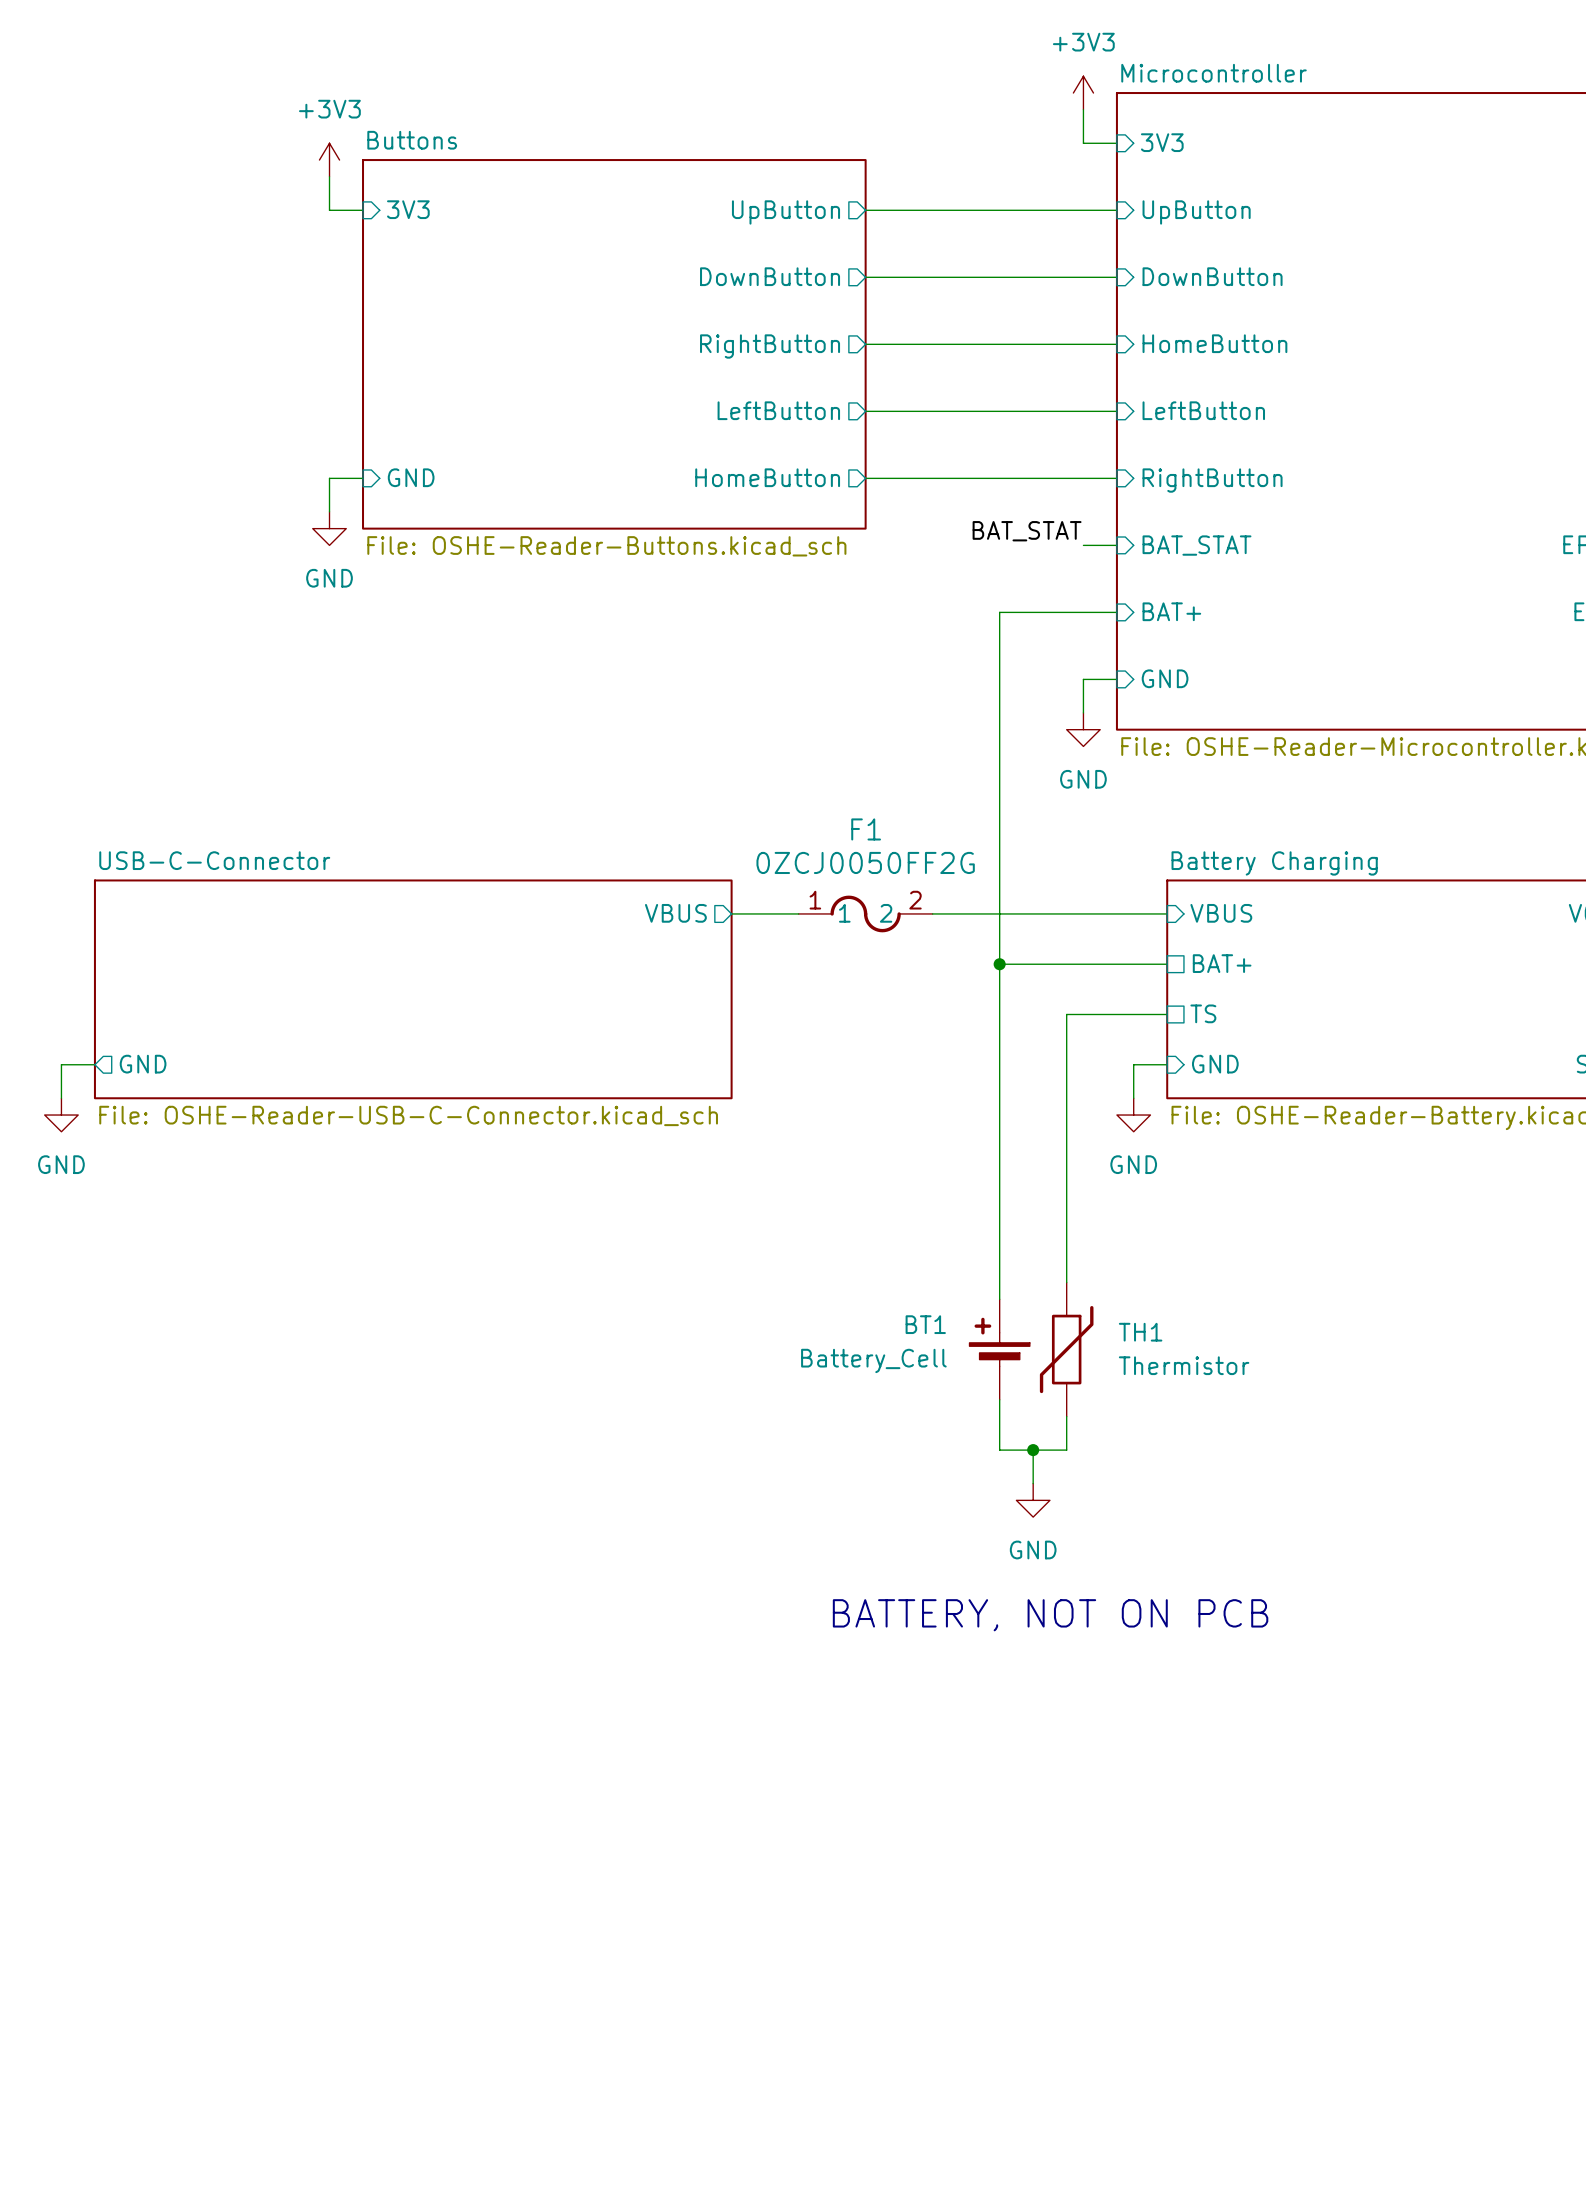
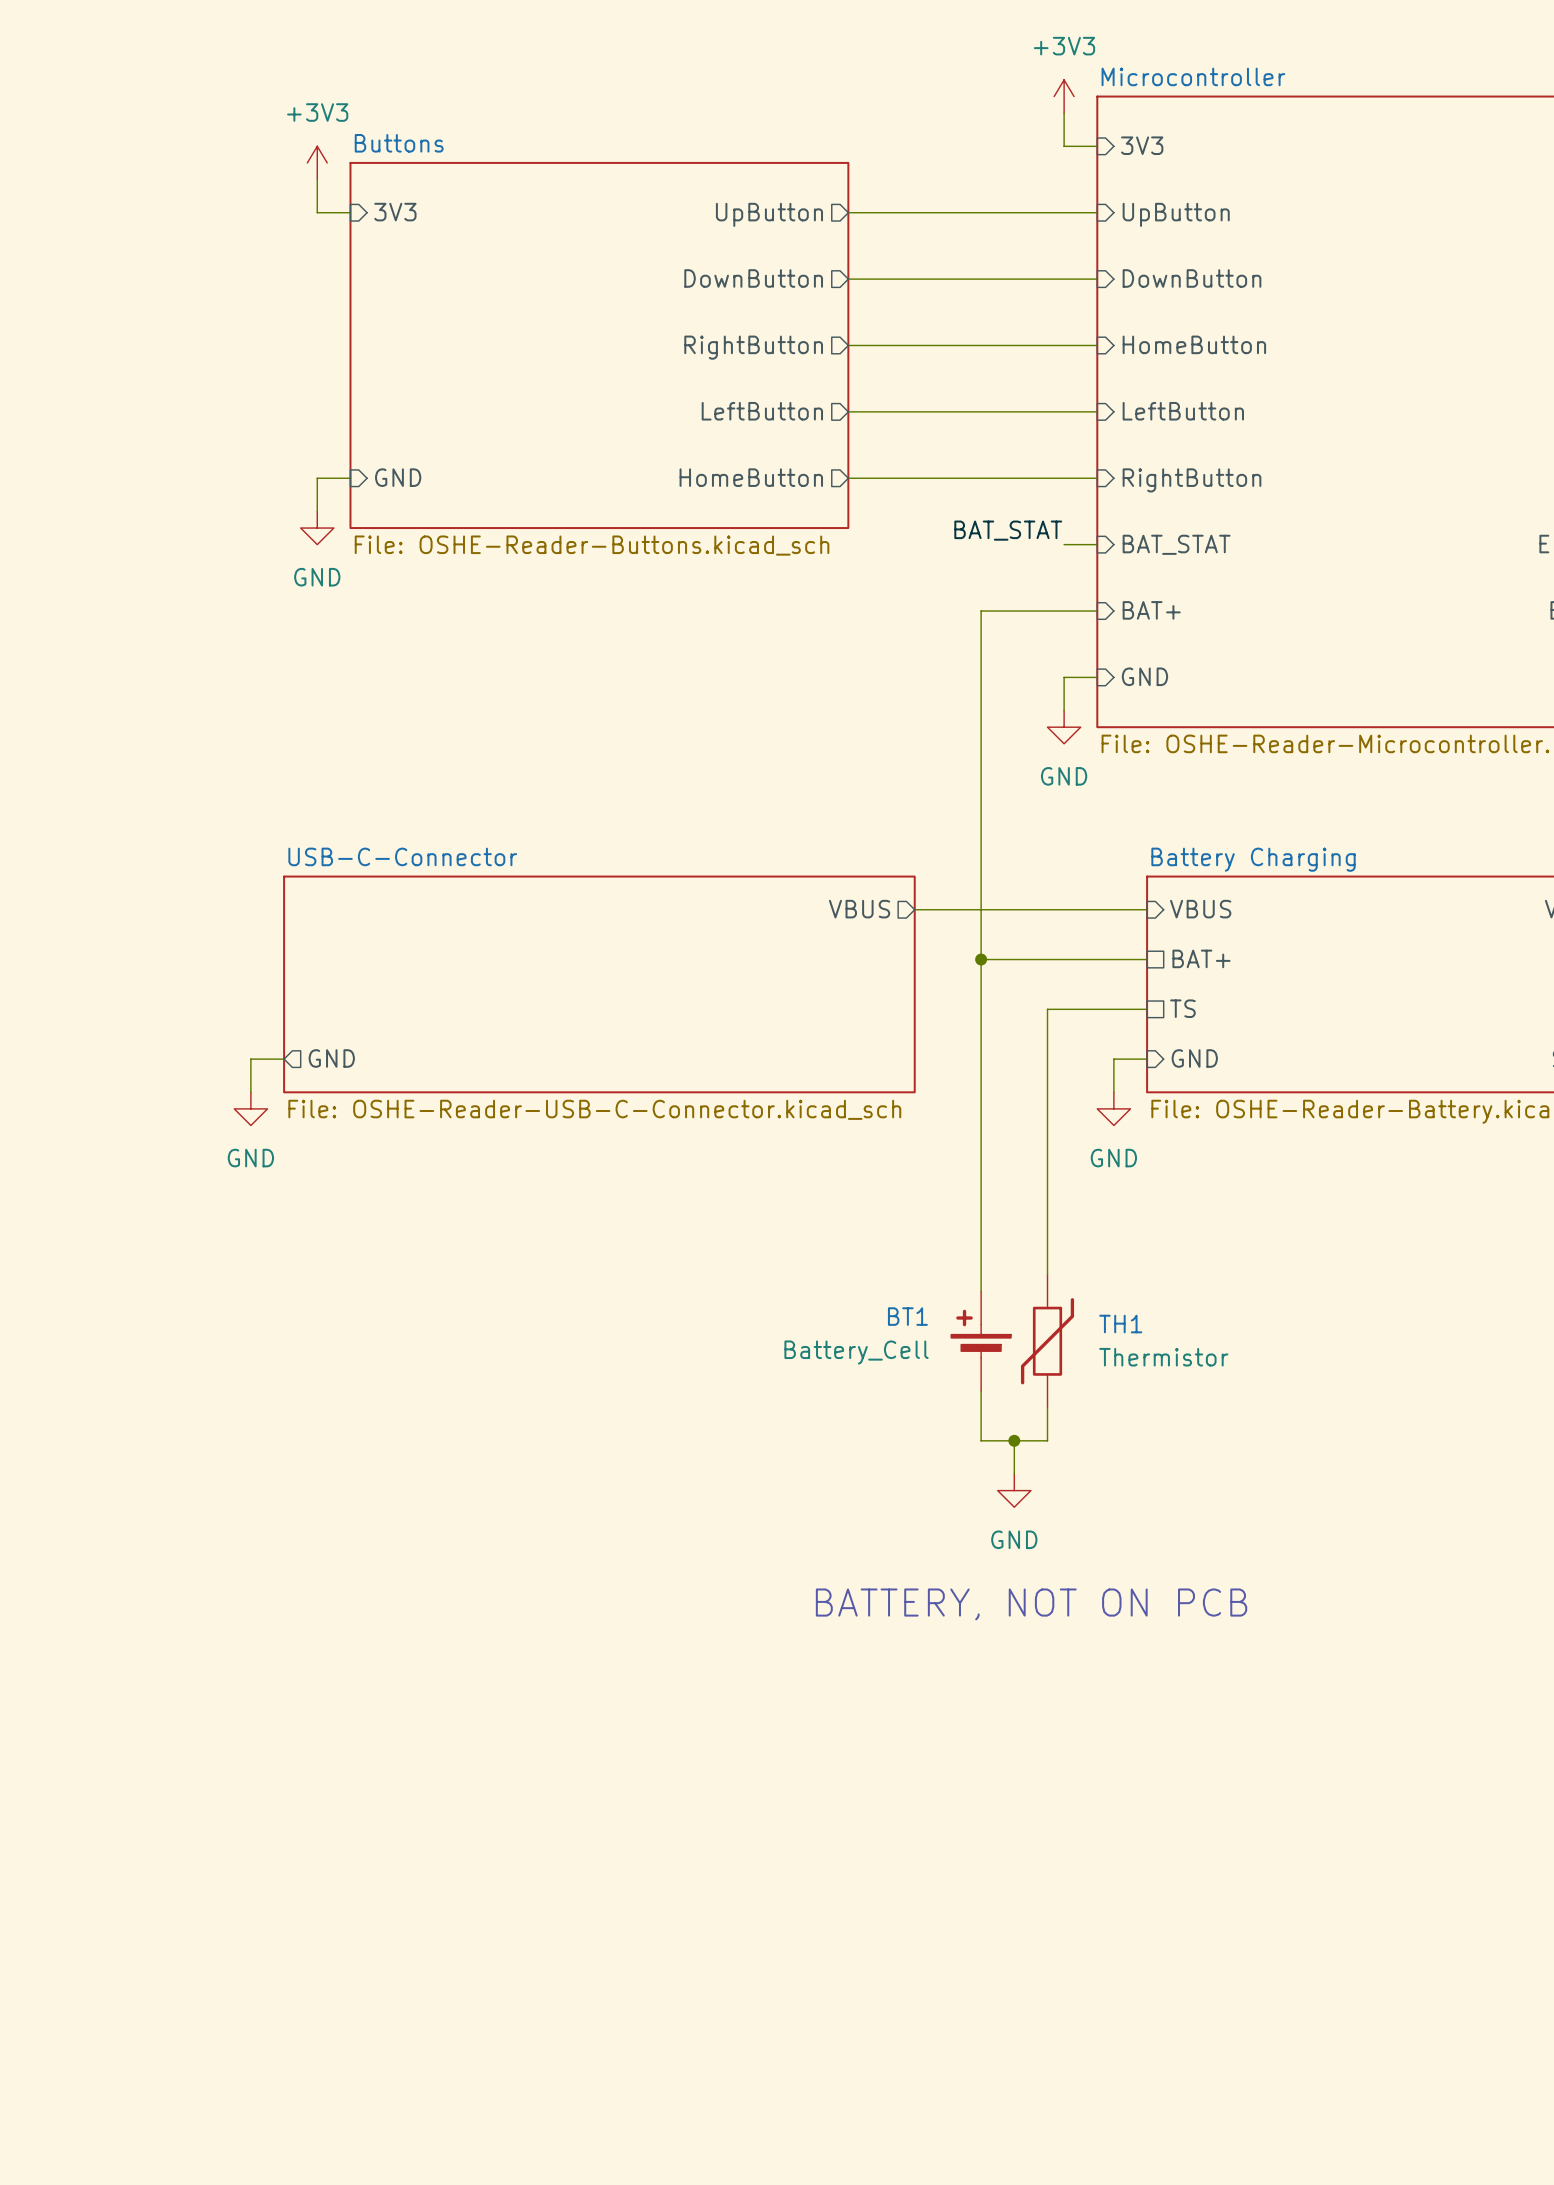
sheet pin position: VBUS (675, 913) -> VBUS (859, 909)
wire: (731, 913) (798, 913) -> none
F1: 0ZCJ0050FF2G (865, 913) -> none
sheet USB-C-Connector position: (413, 989) -> (599, 984)
wire: (94, 1064) (61, 1064) (61, 1098) -> (284, 1059) (250, 1059) (250, 1092)
sheet pin position: GND (143, 1064) -> GND (331, 1058)
power symbol position: GND (61, 1115) -> GND (250, 1108)

